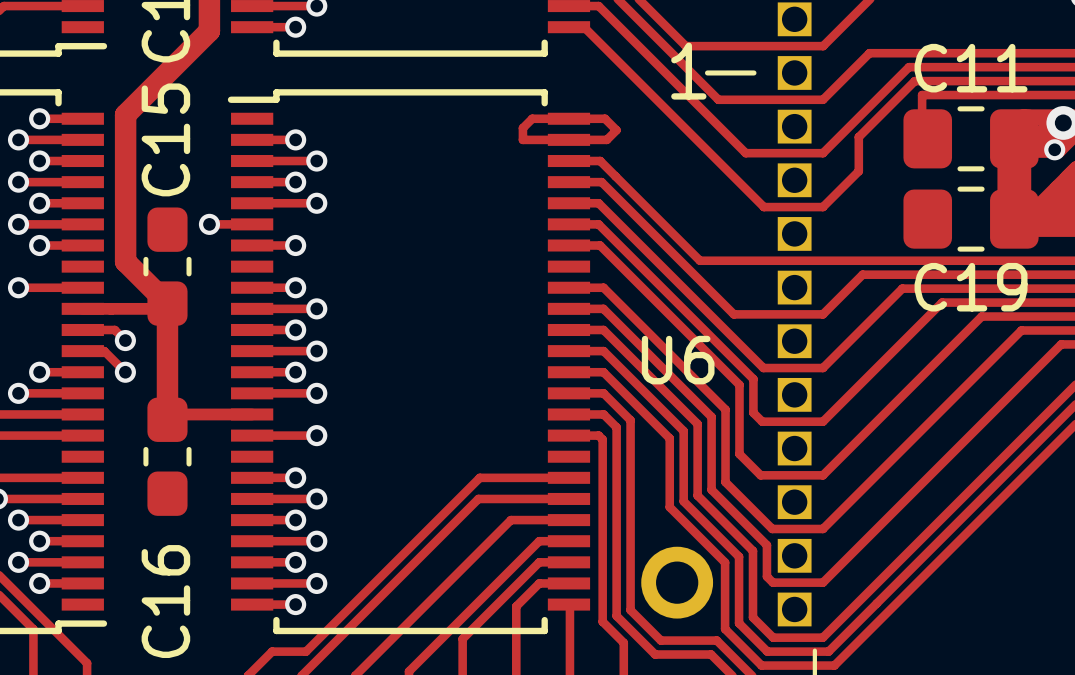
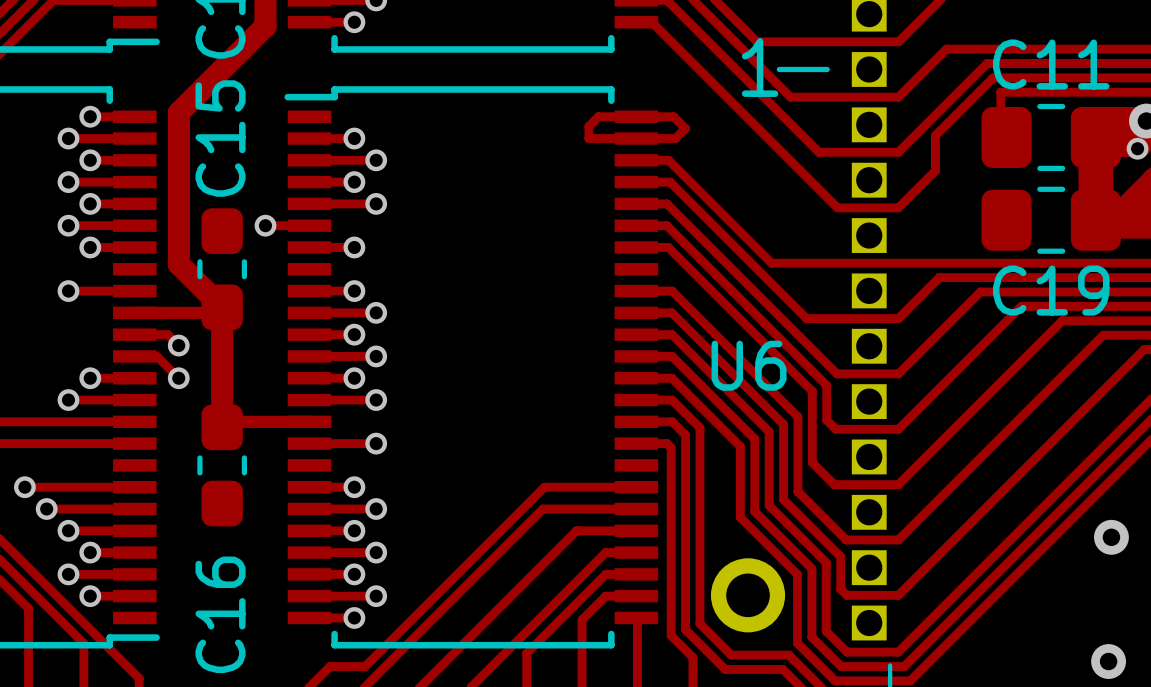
via: none -> (1111, 537)
via: none -> (1108, 661)

